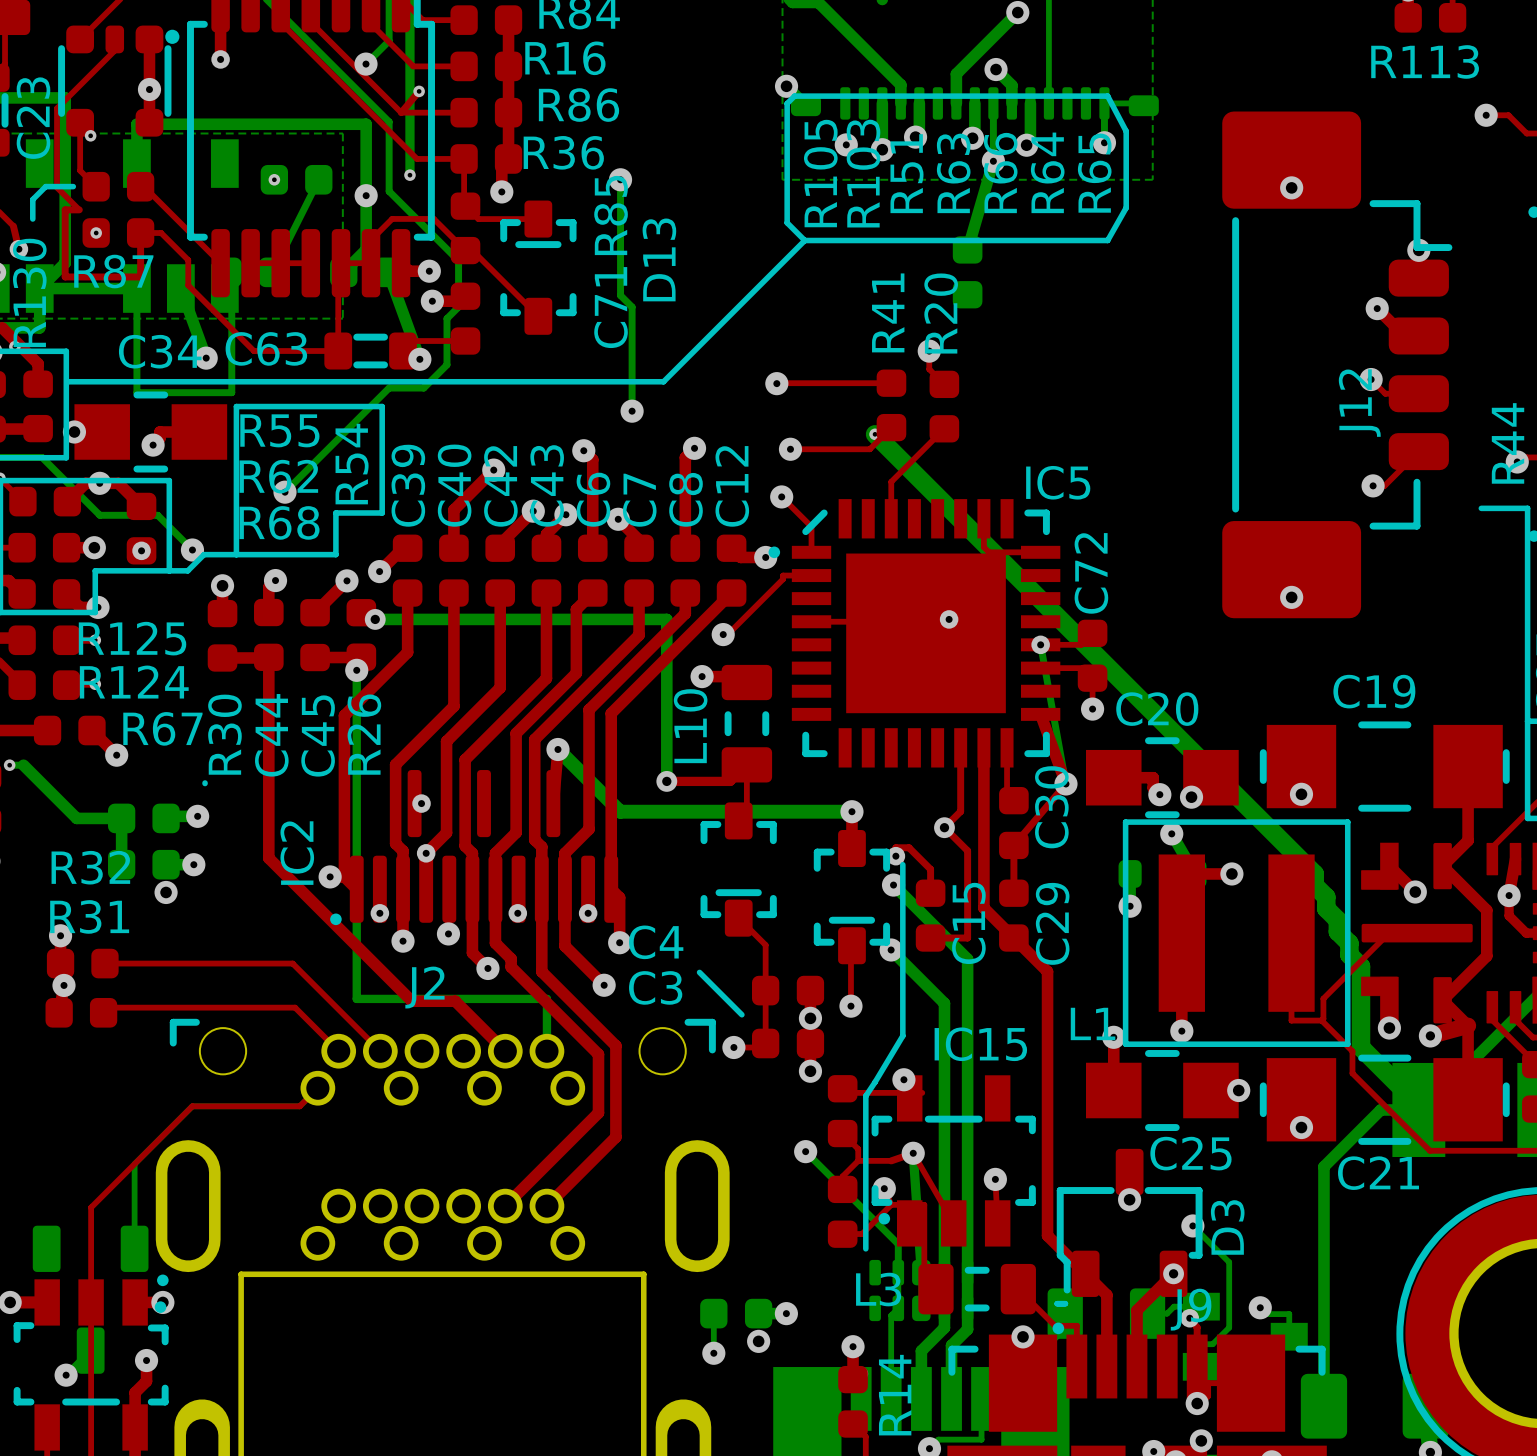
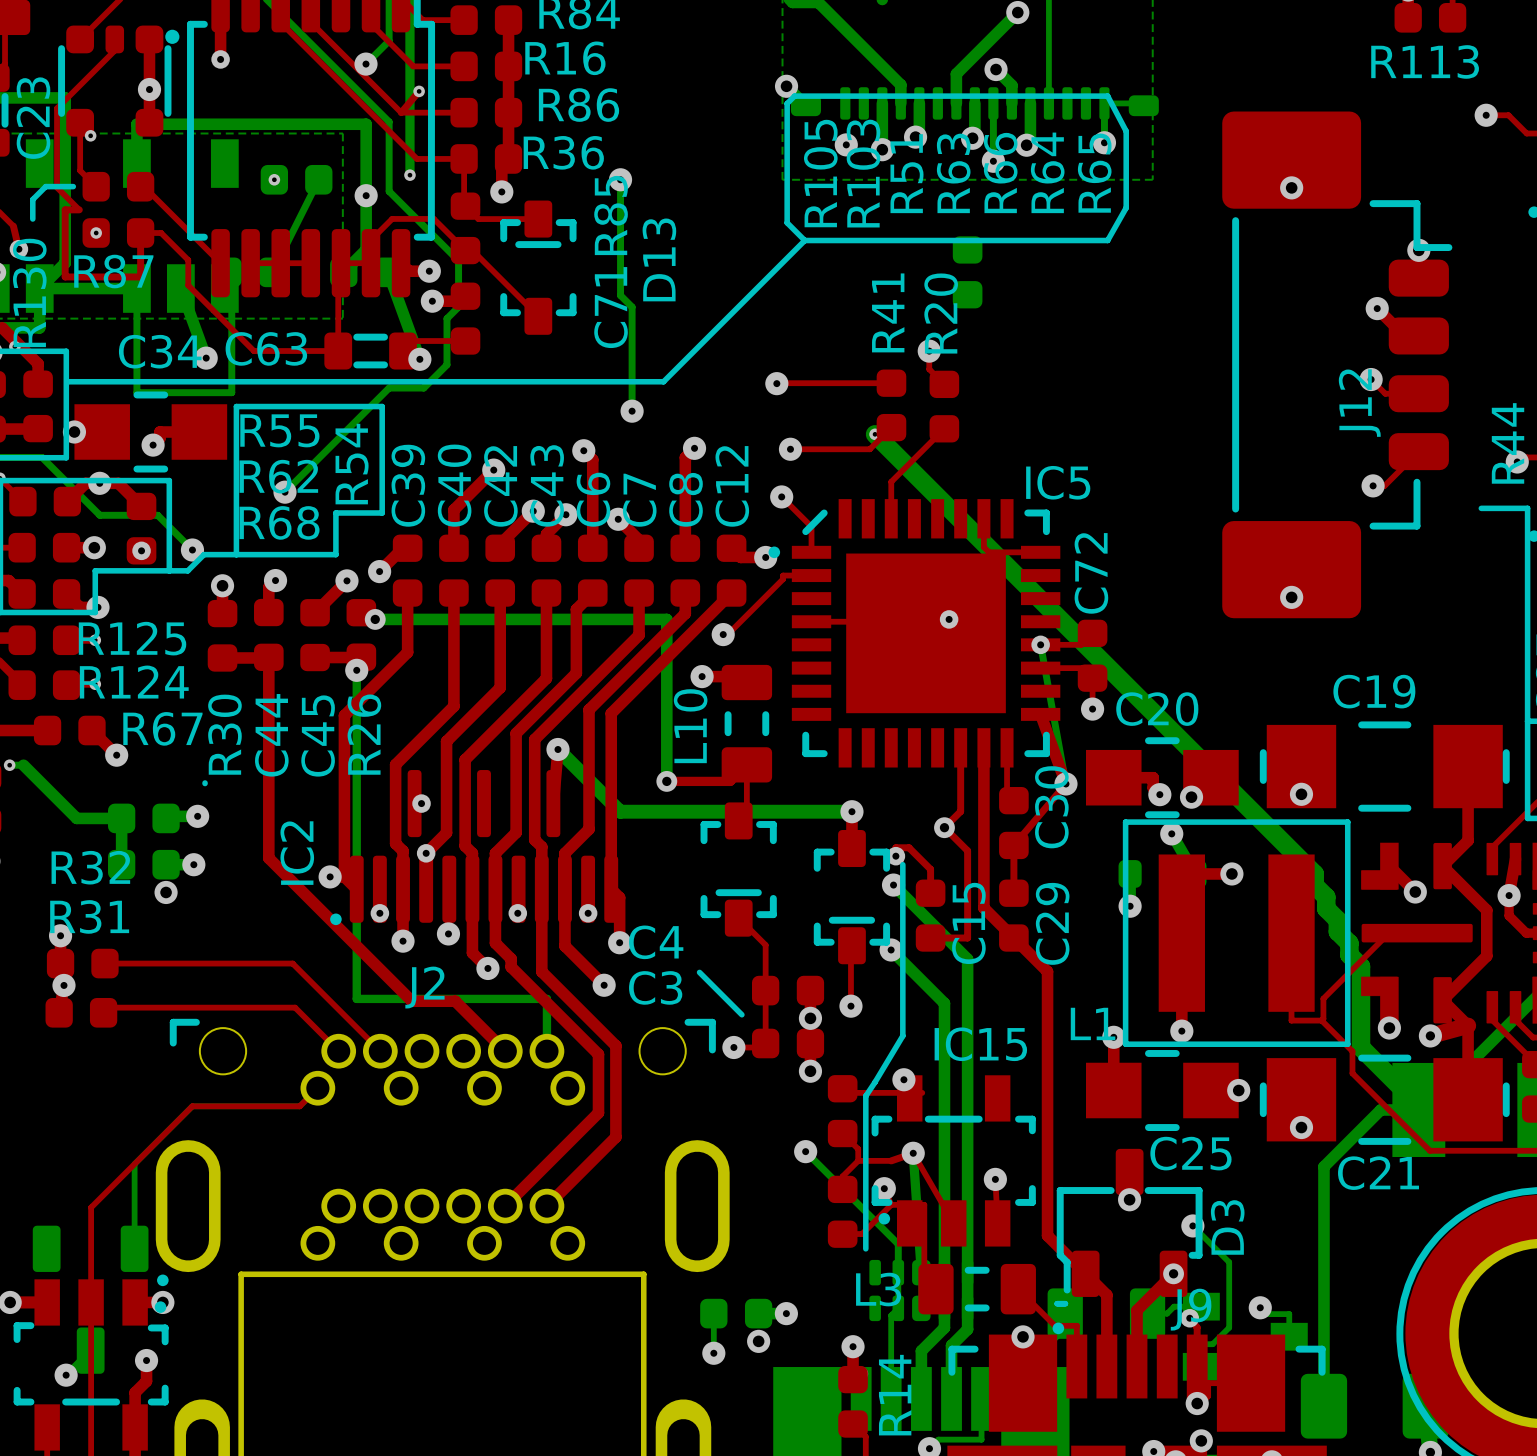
bottom track: (993, 161) (967, 249) -> none

